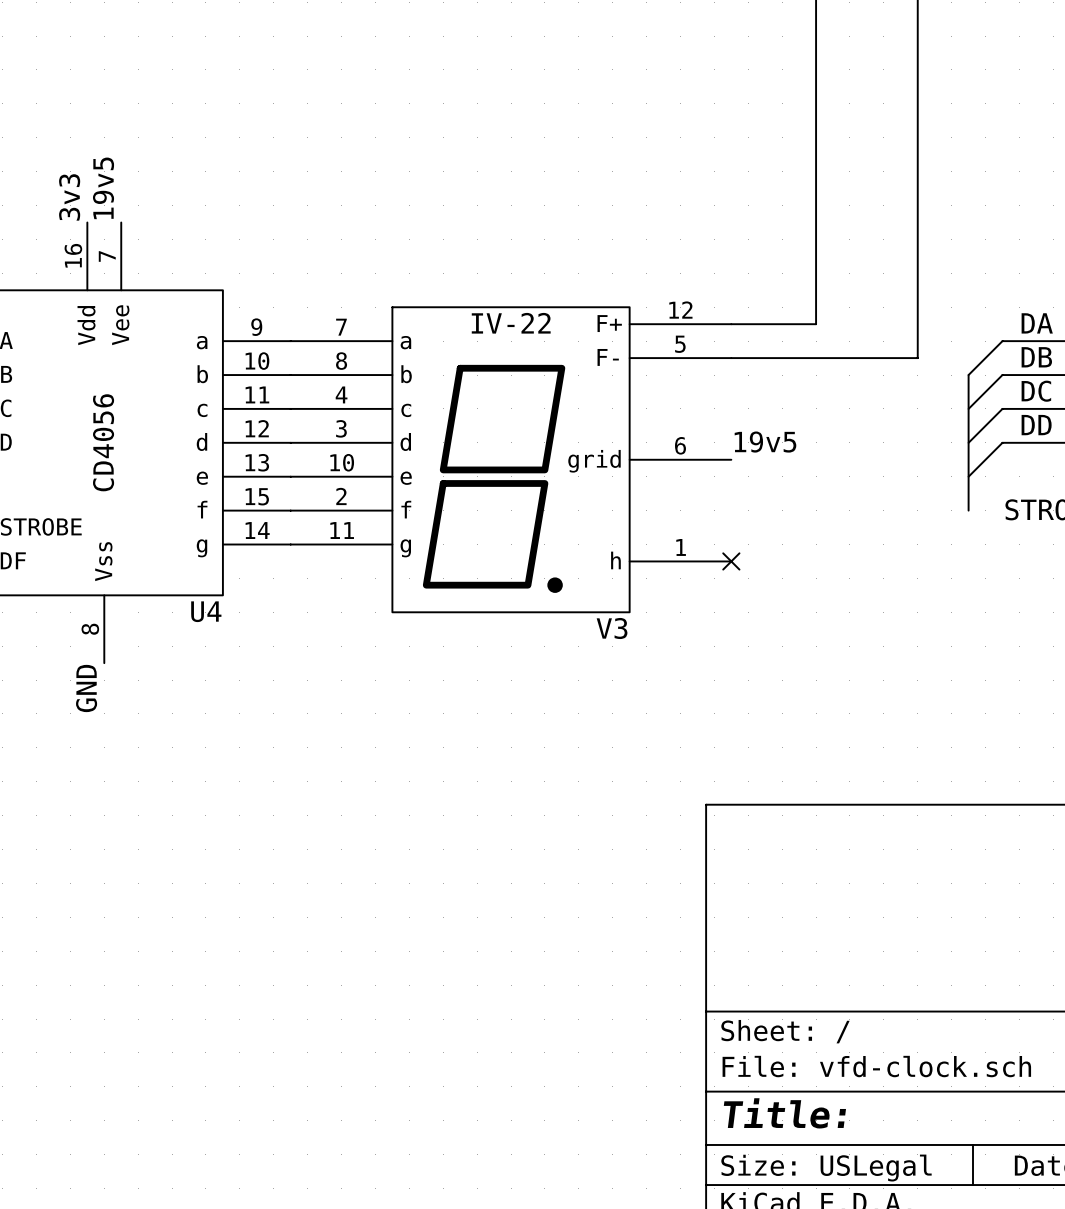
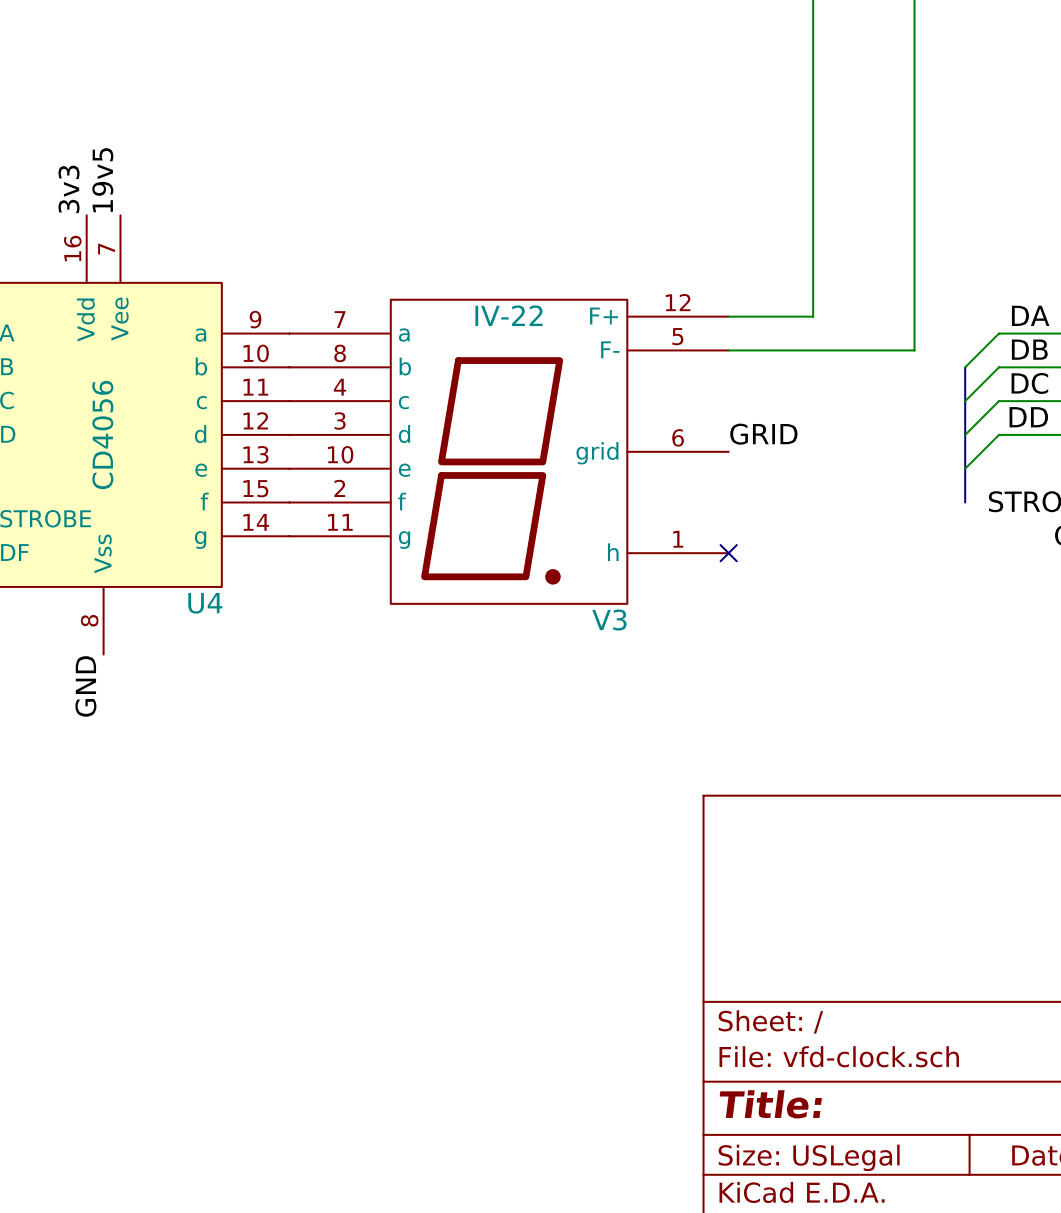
label: 19v5 (765, 442) -> GRID (763, 434)

